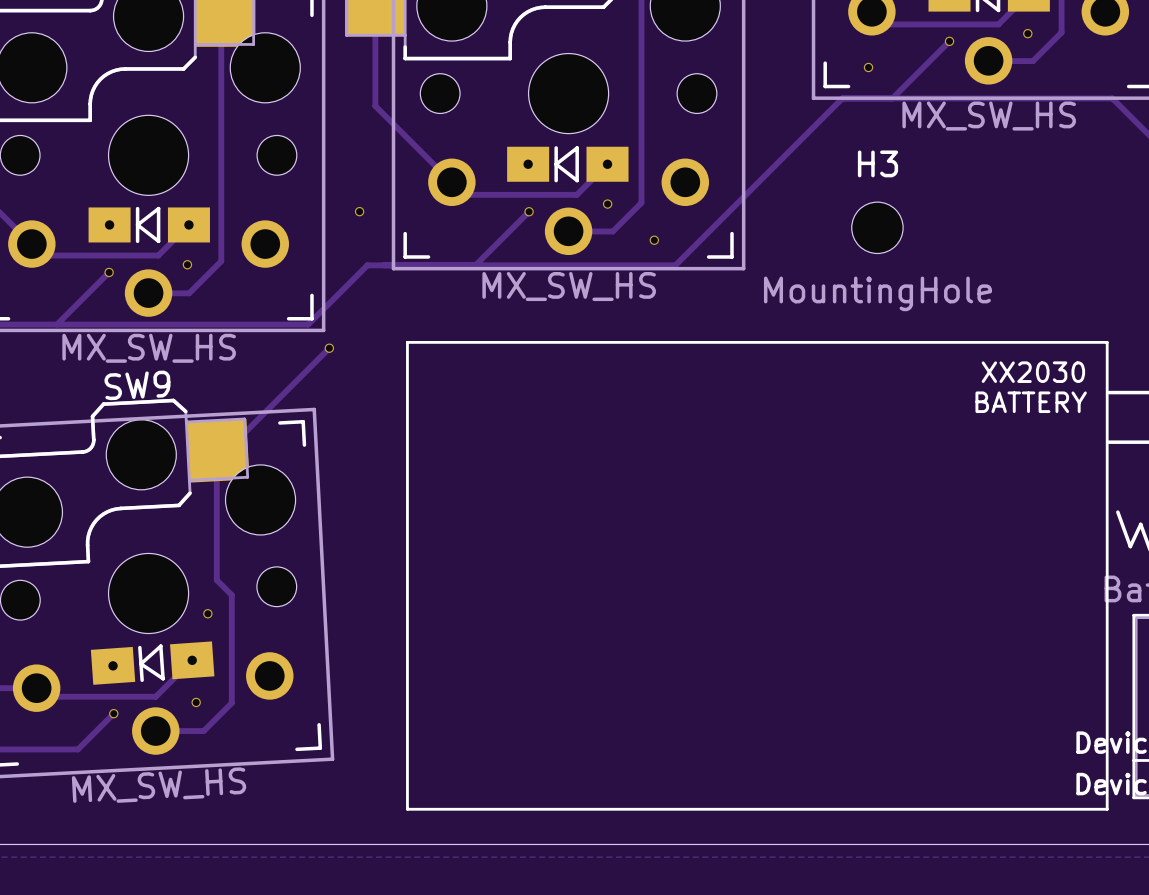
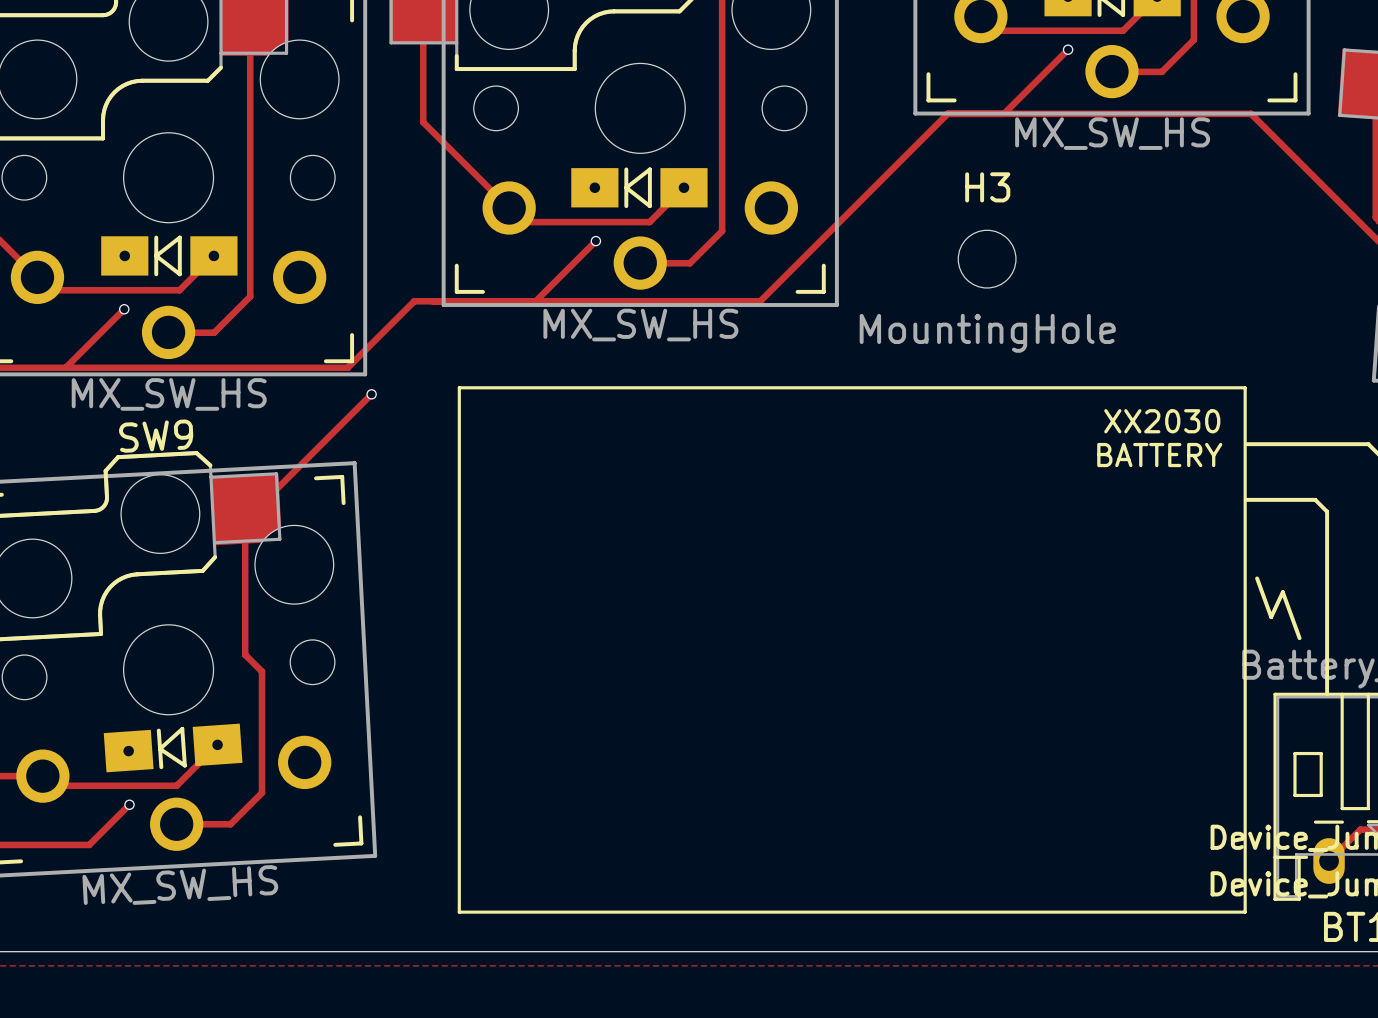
via: (1027, 33) -> none
via: (868, 67) -> none
via: (607, 204) -> none
via: (359, 211) -> none
via: (654, 240) -> none
via: (187, 264) -> none
via: (207, 613) -> none
via: (196, 702) -> none

